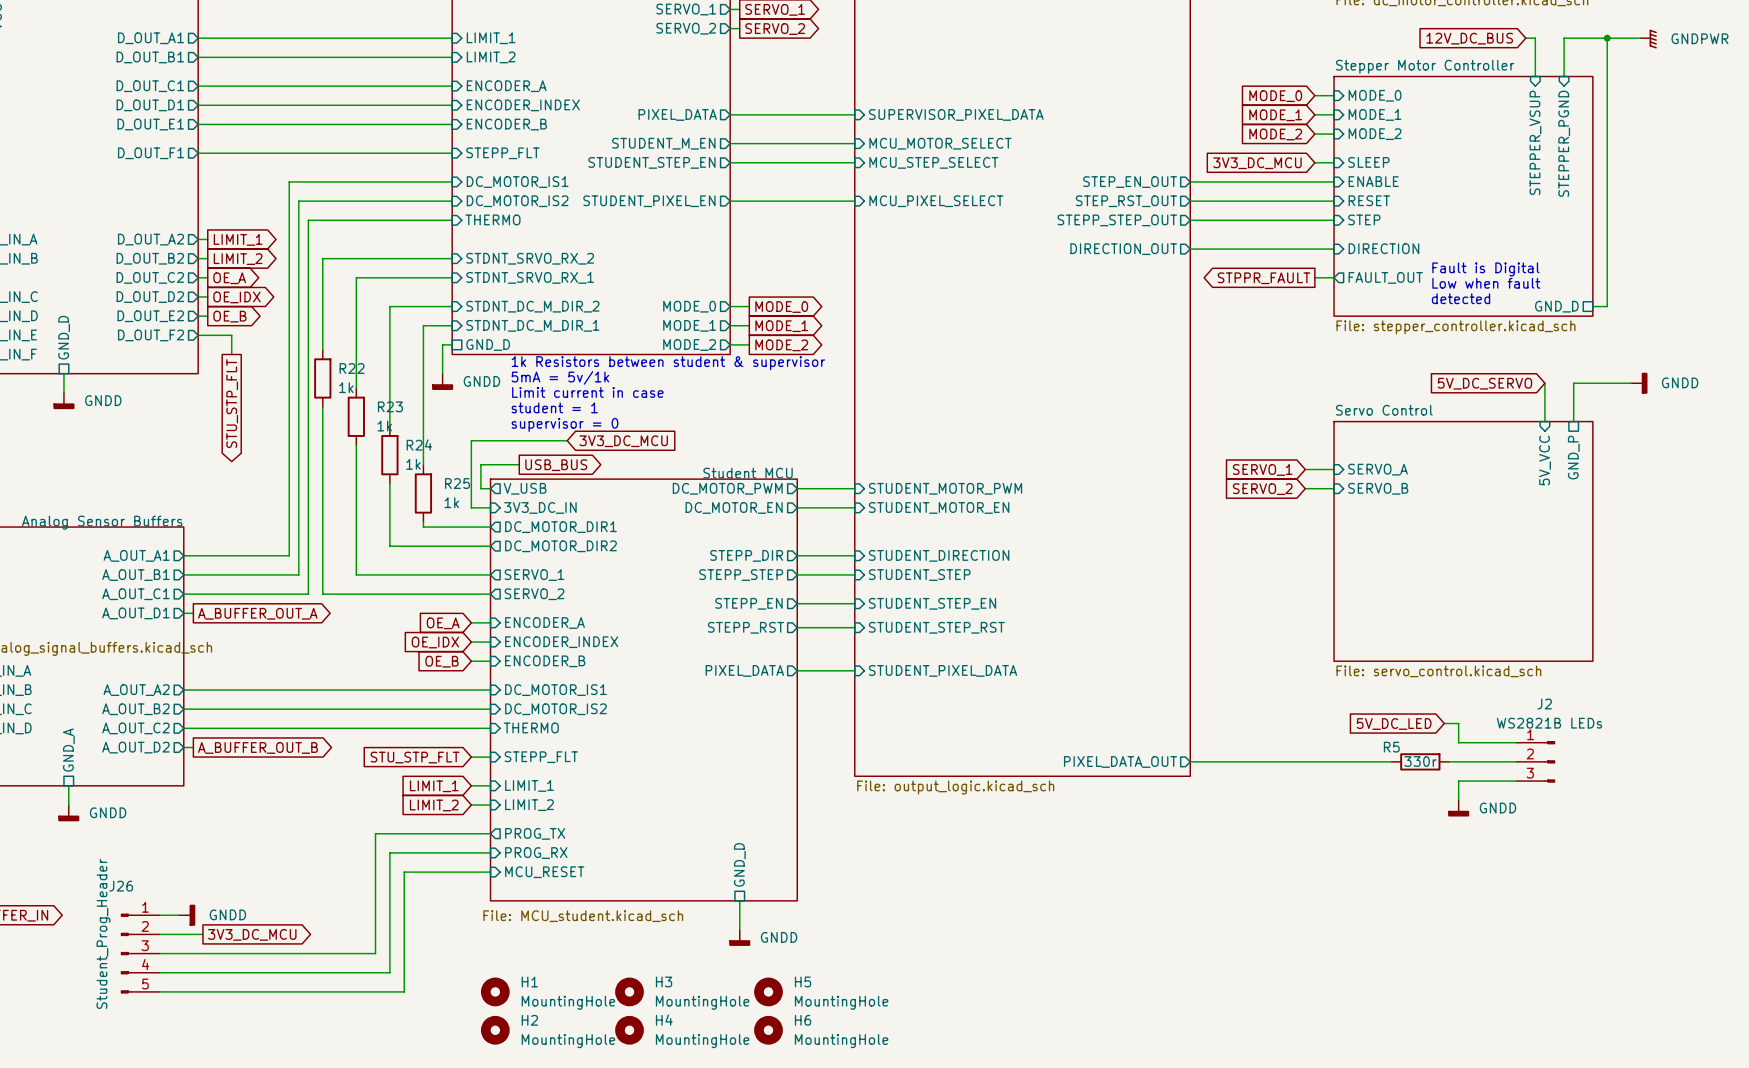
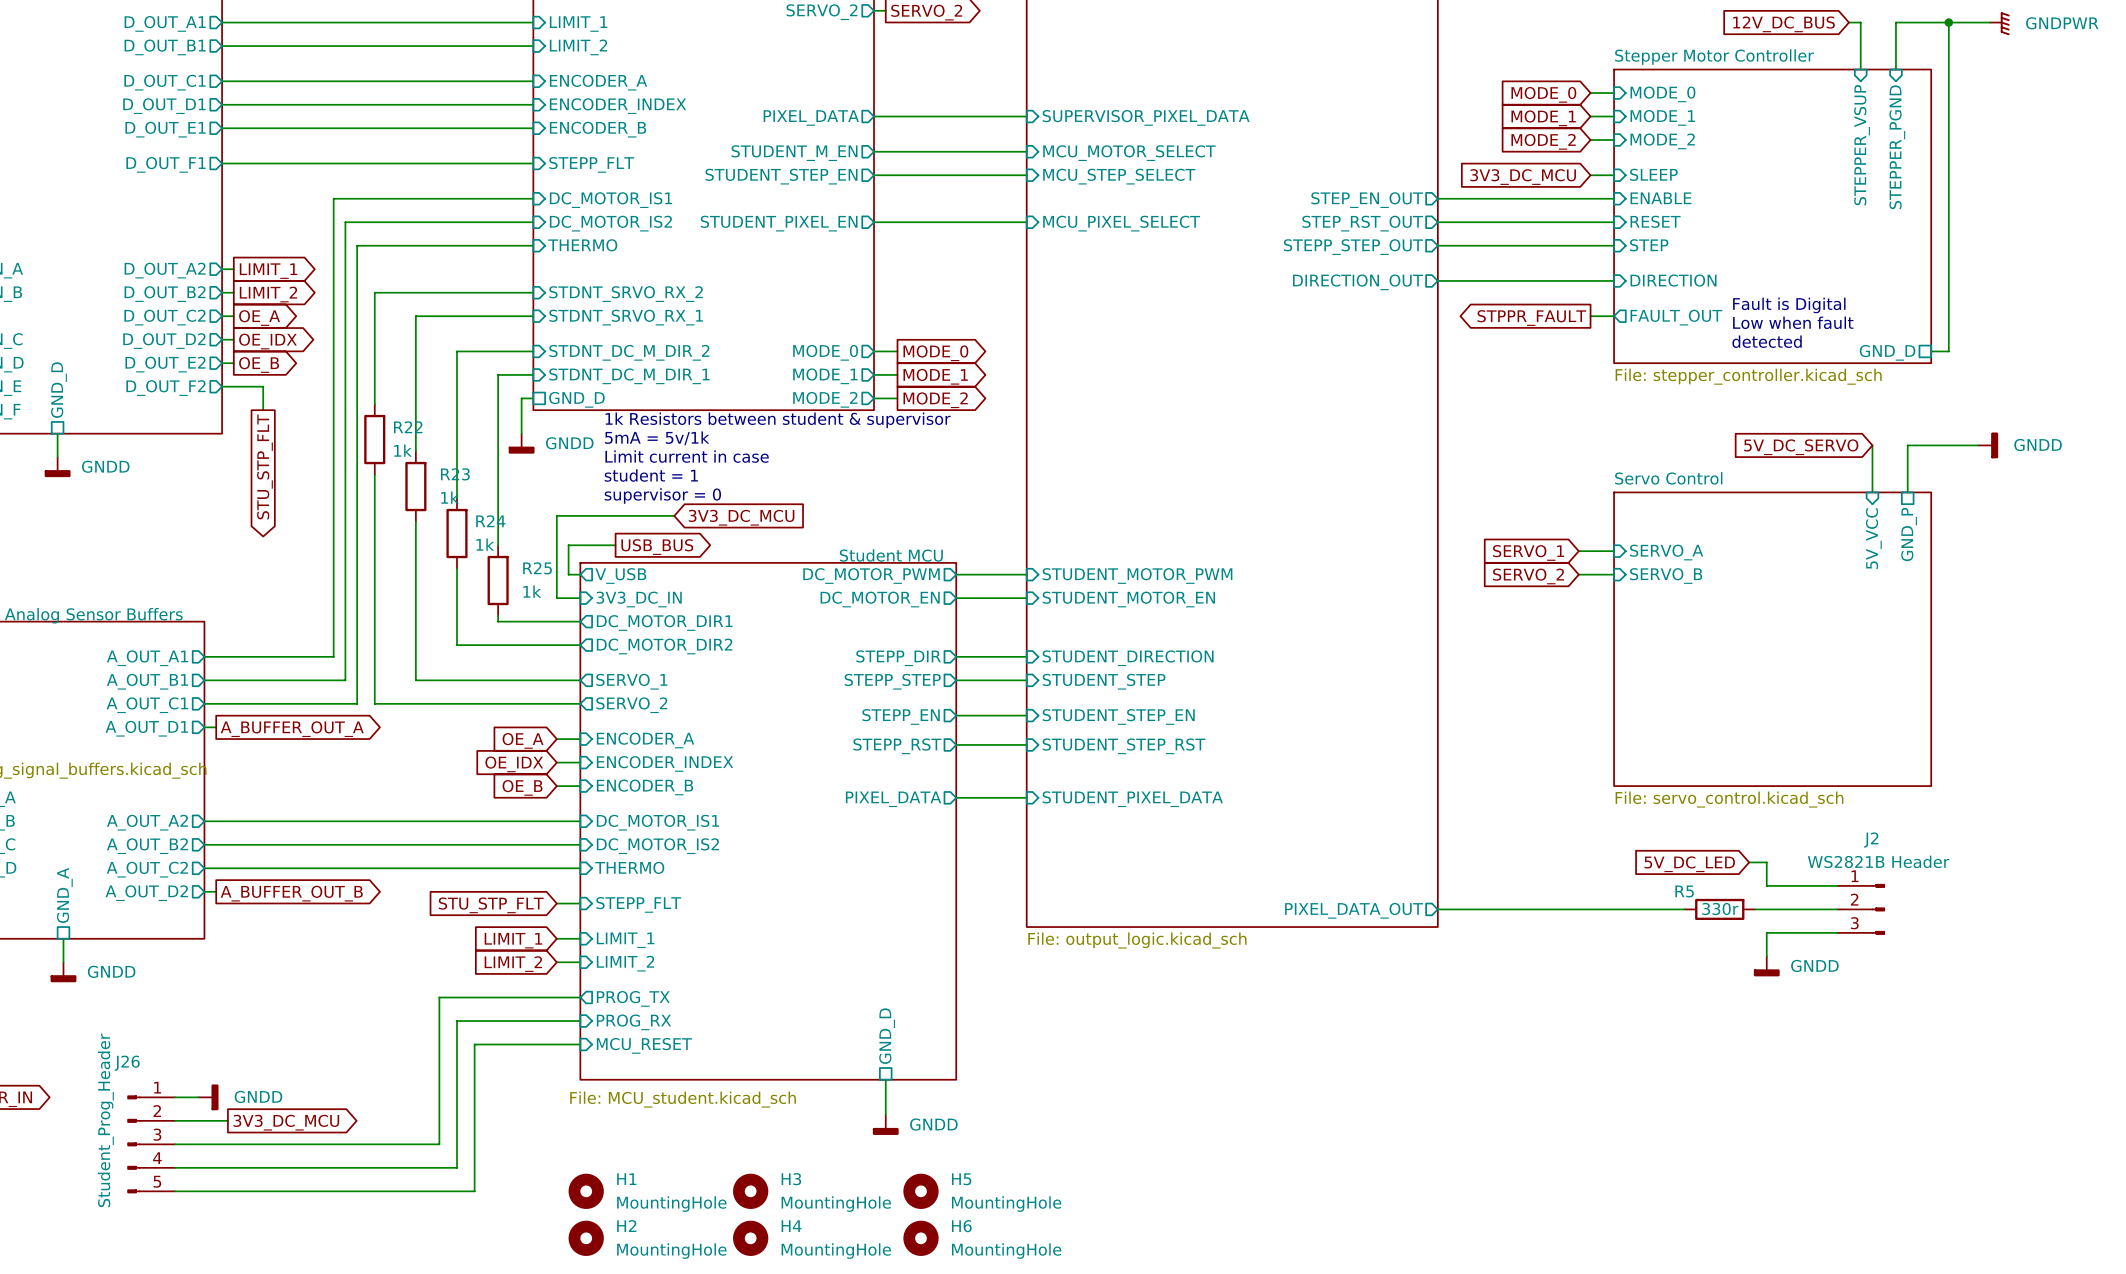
J2 value: WS2821B LEDs (1549, 723) -> WS2821B Header (1878, 861)

